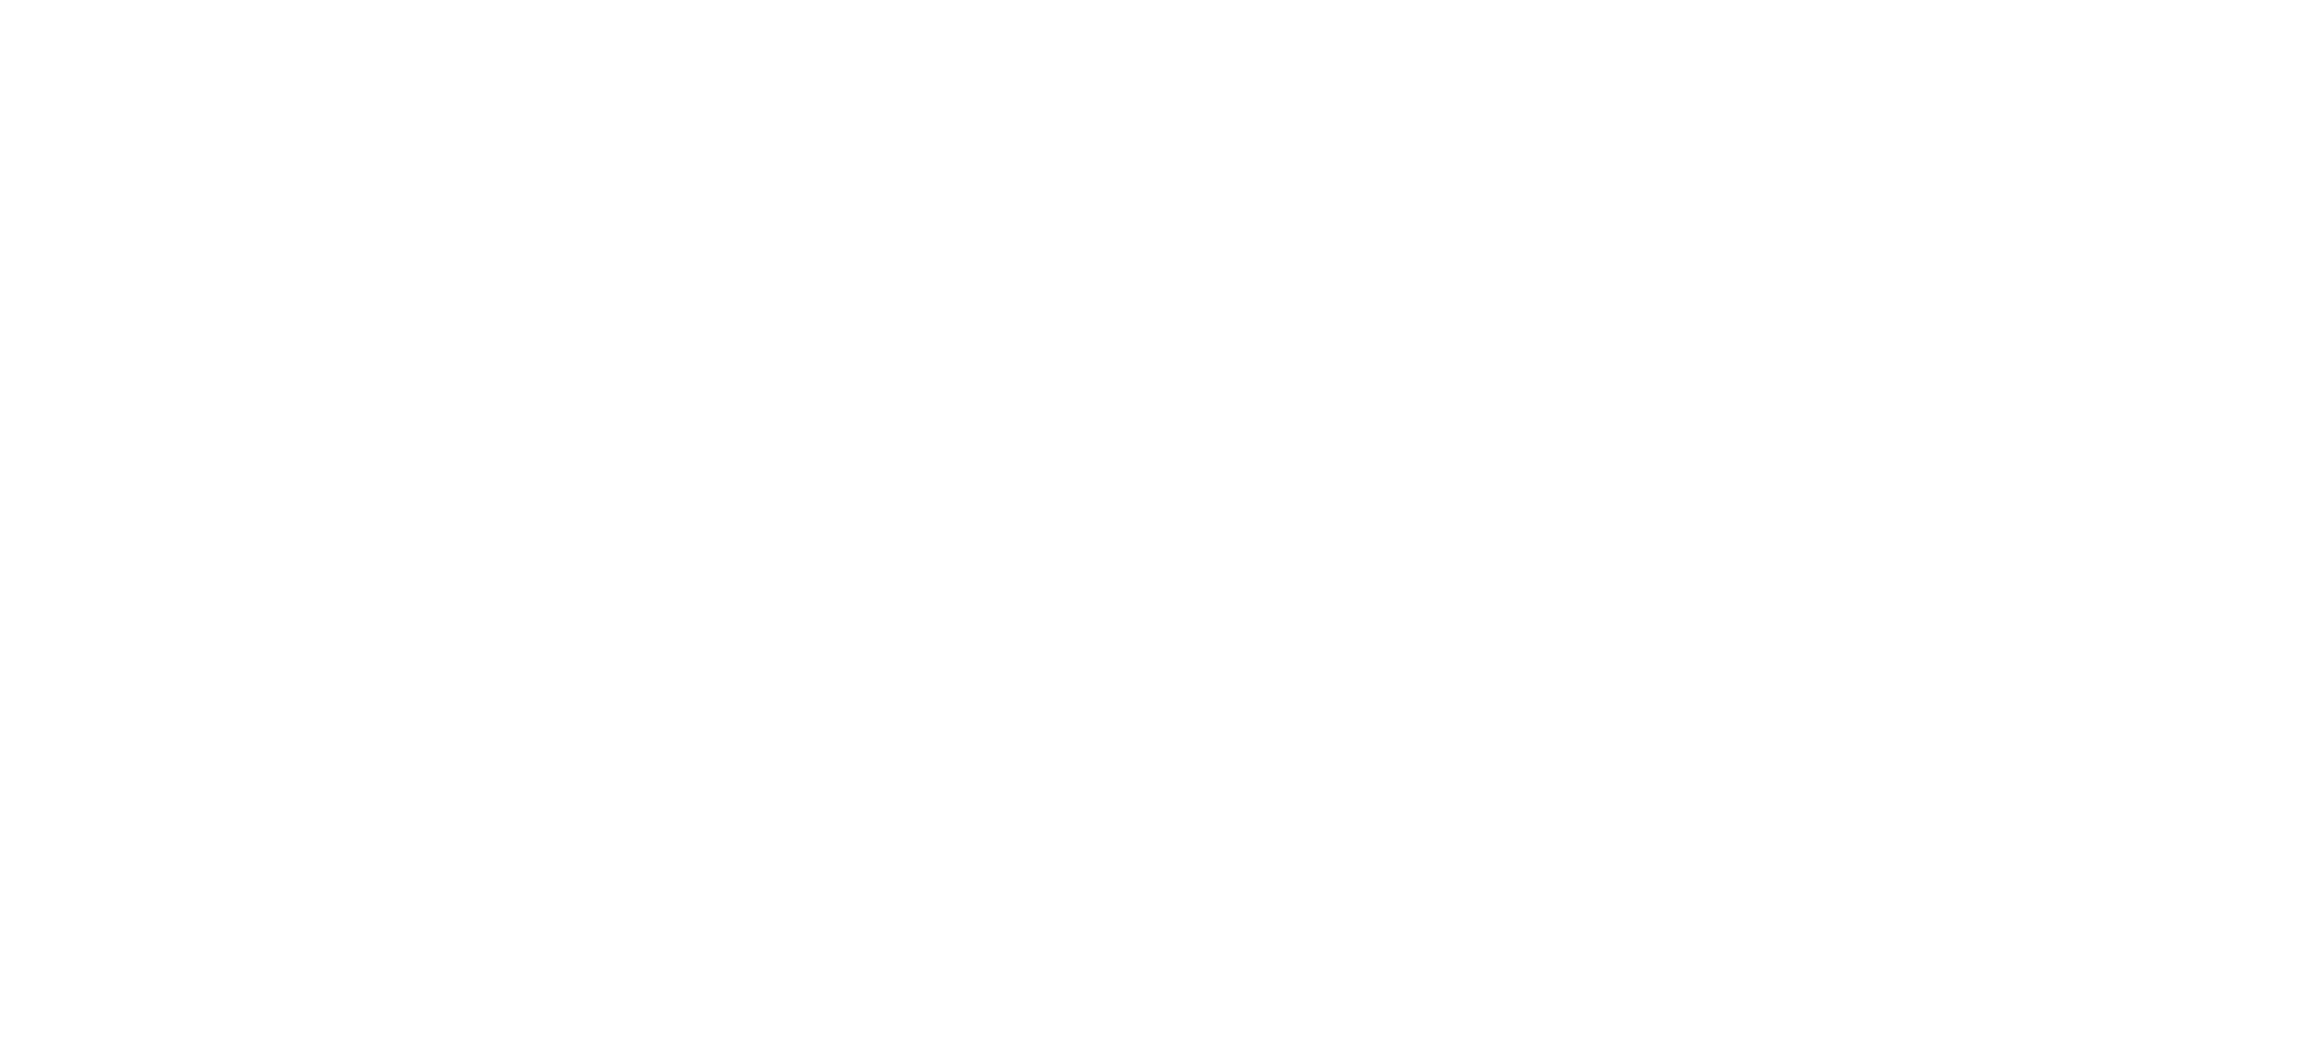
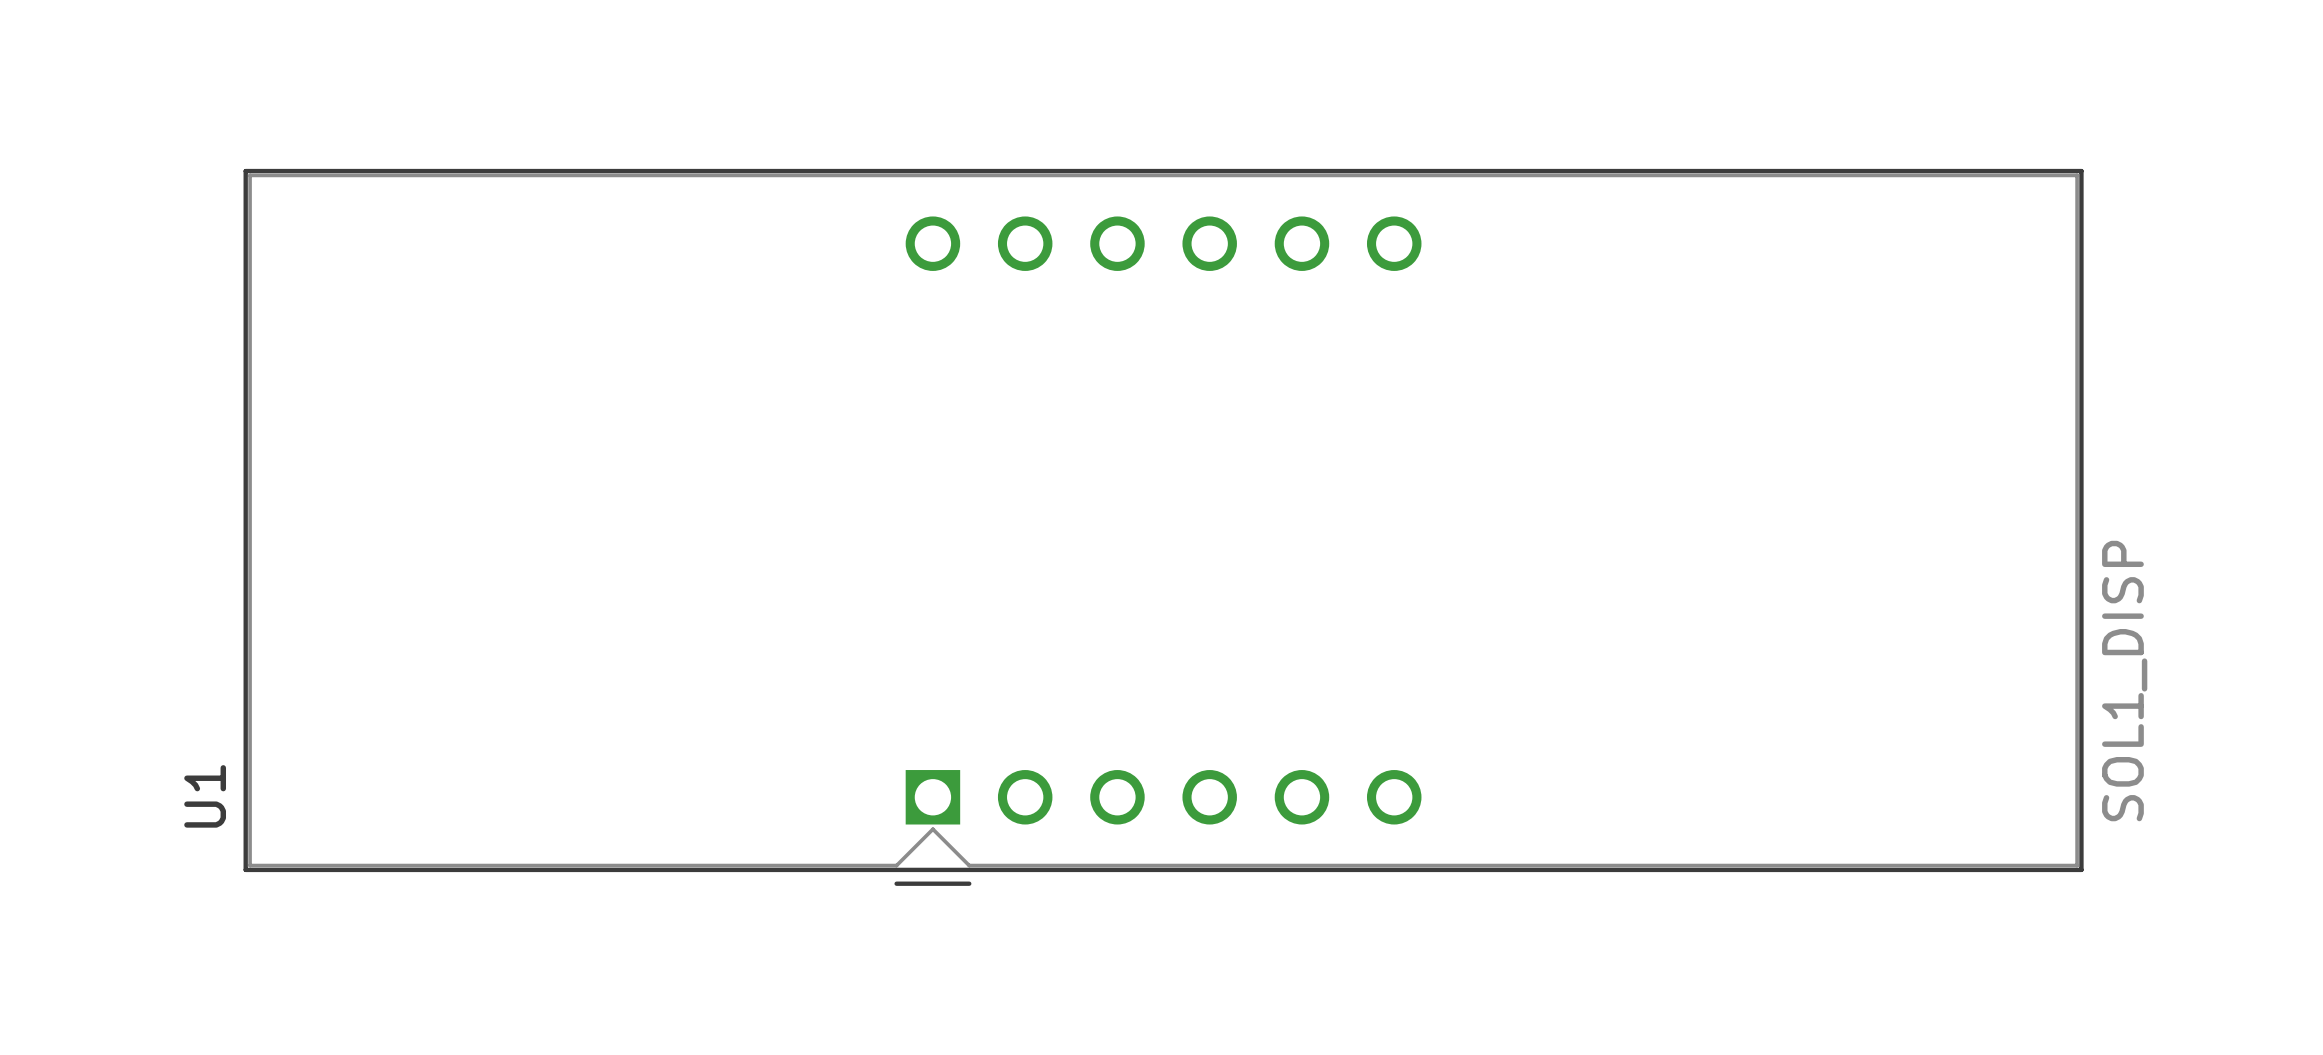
U1: none -> SOL1_DISP (1163, 527)

